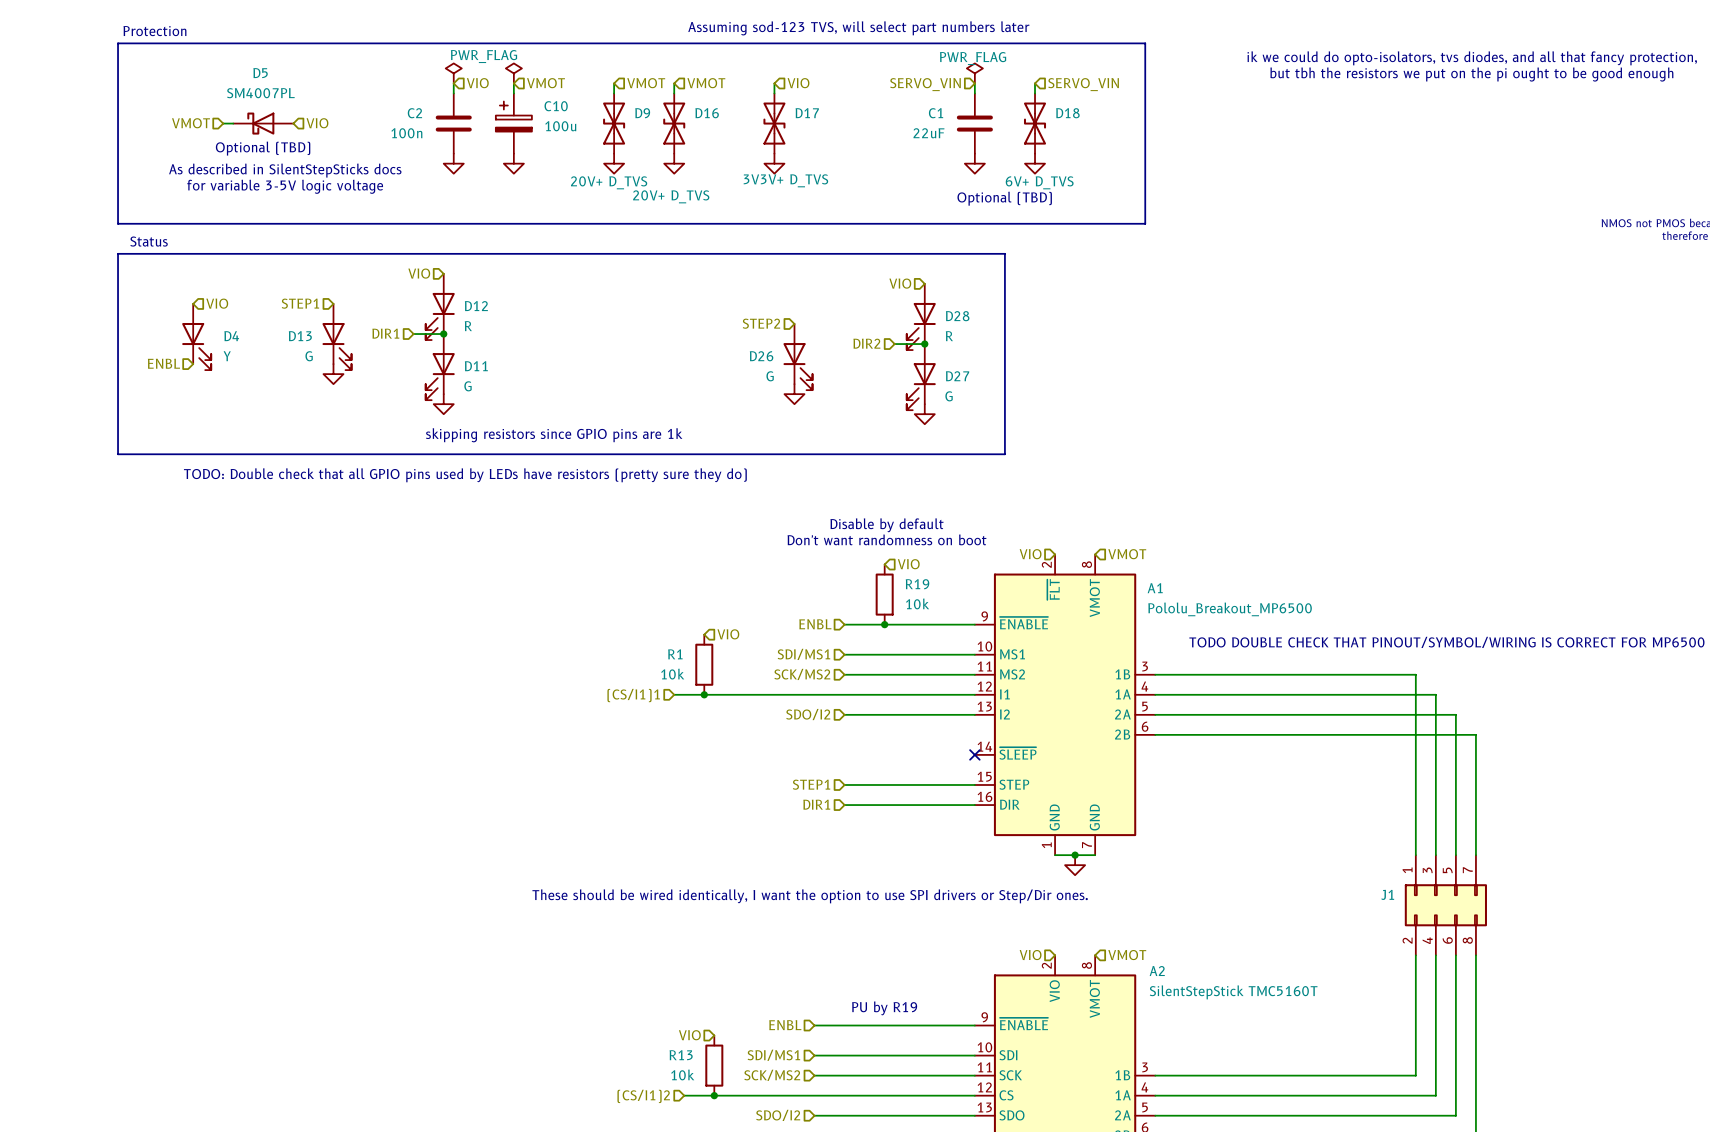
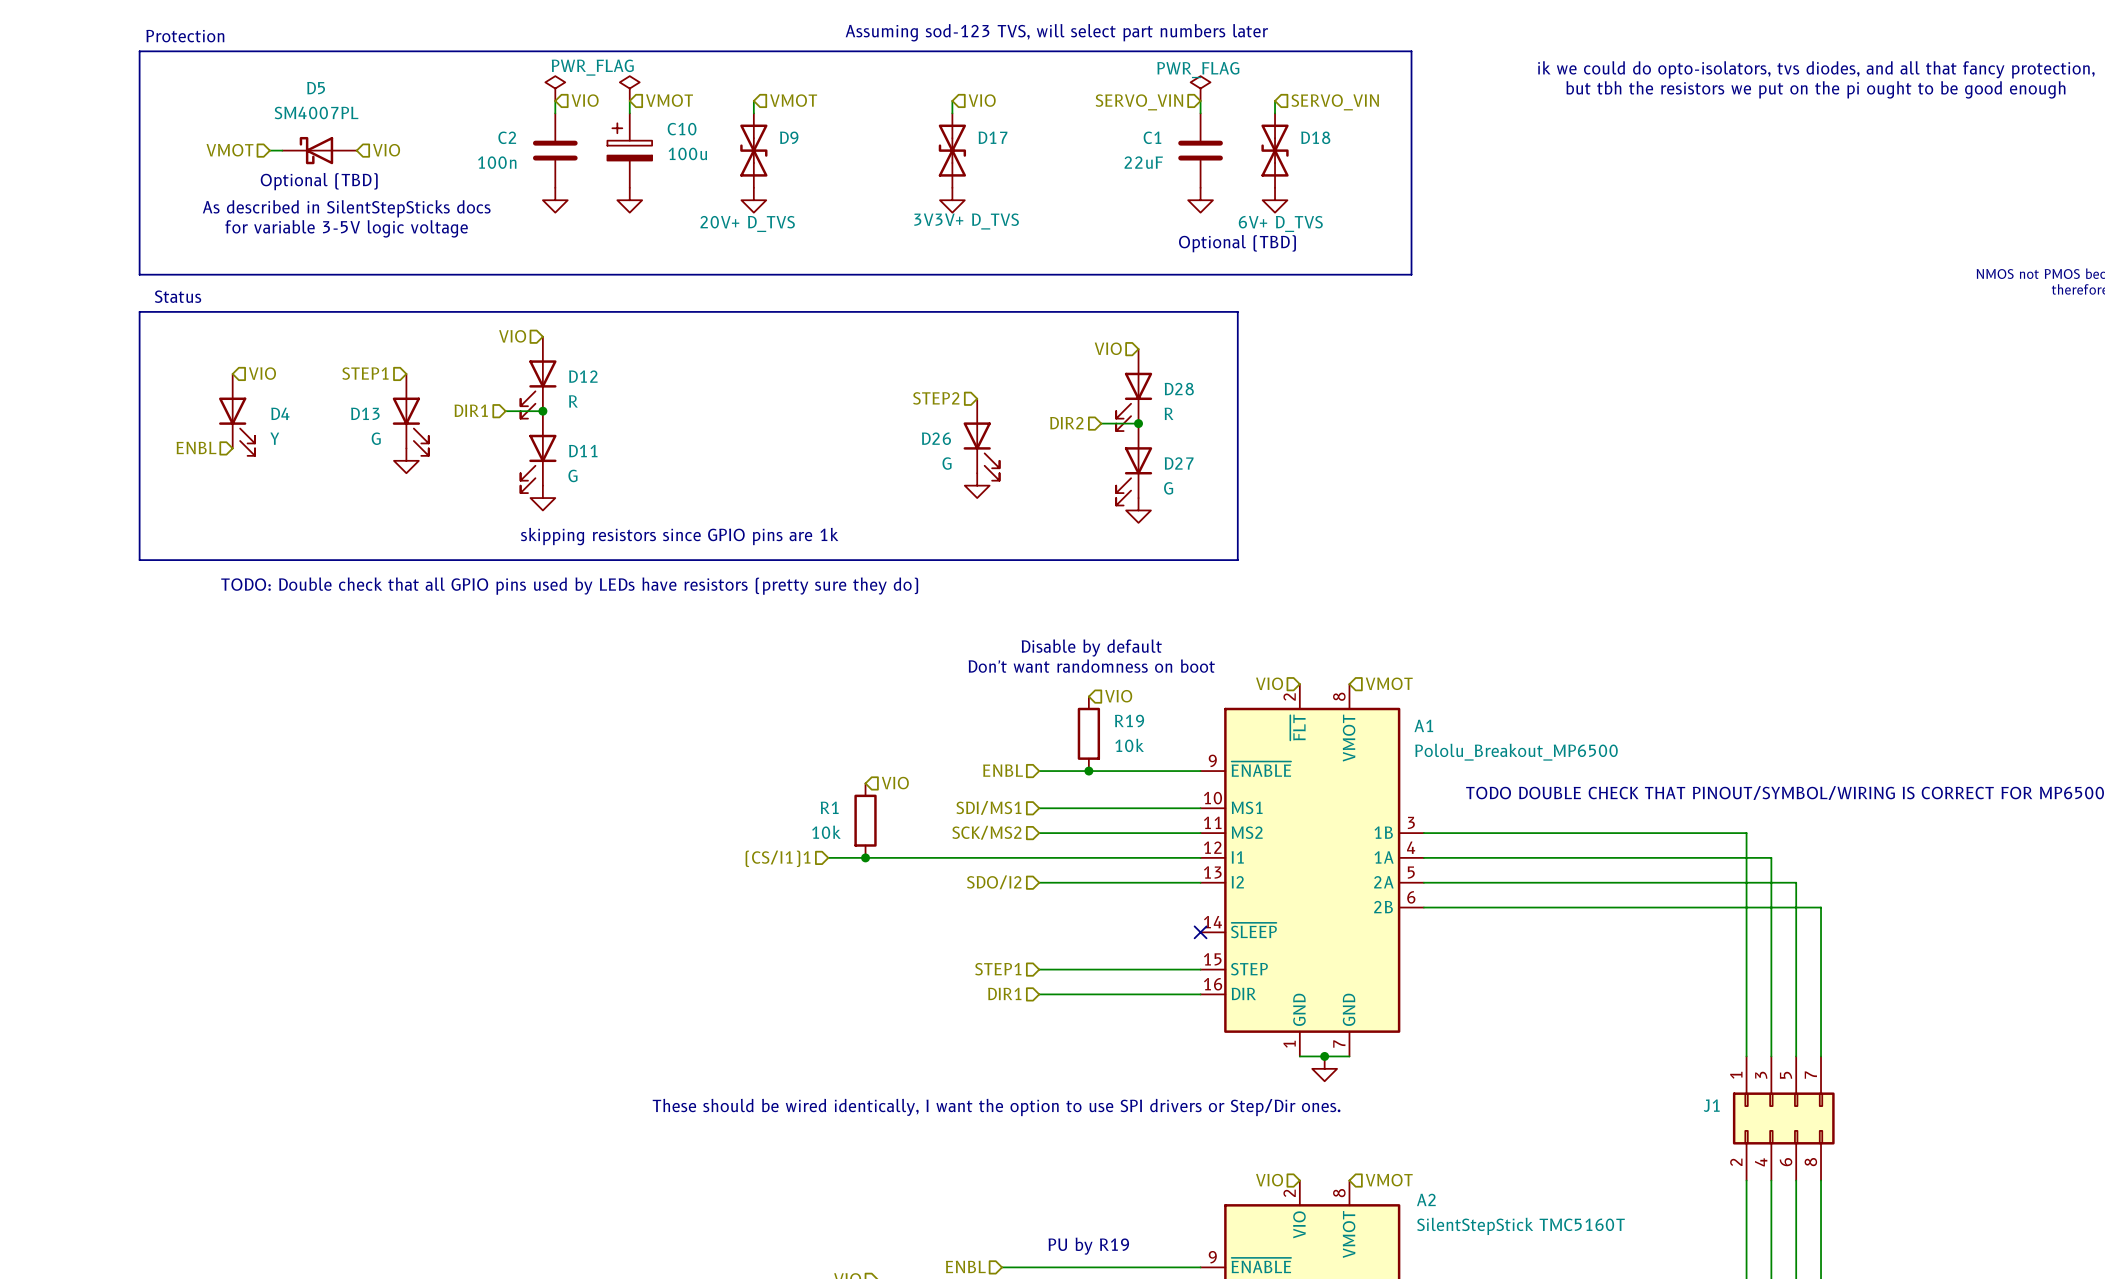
wire: (674, 83) (674, 93) -> none
hierarchical label: VMOT (706, 83) -> none
D16: 20V+ D_TVS (674, 123) -> none
power symbol: (674, 163) -> none

